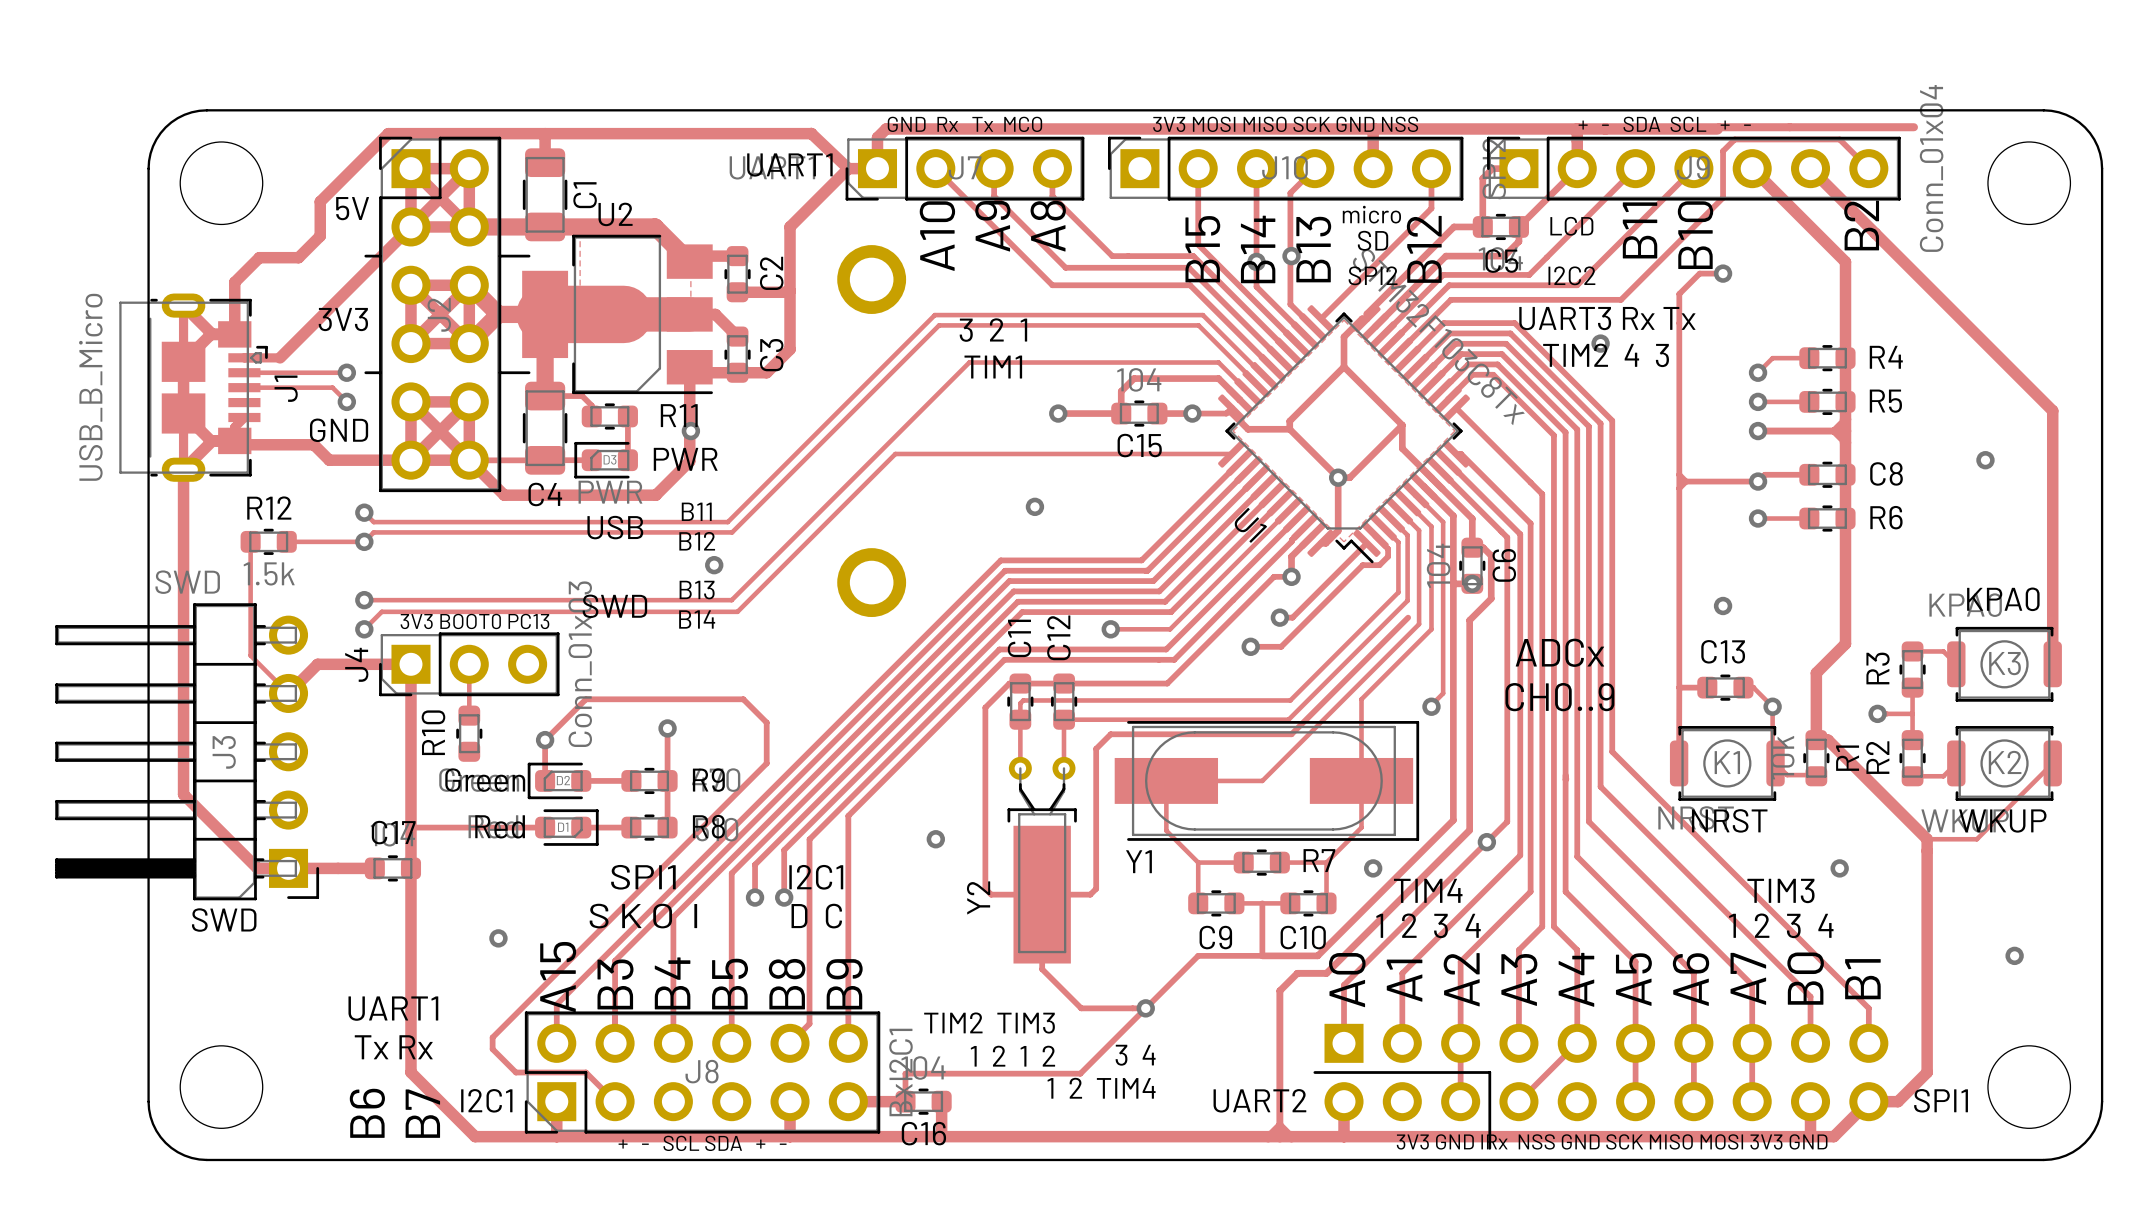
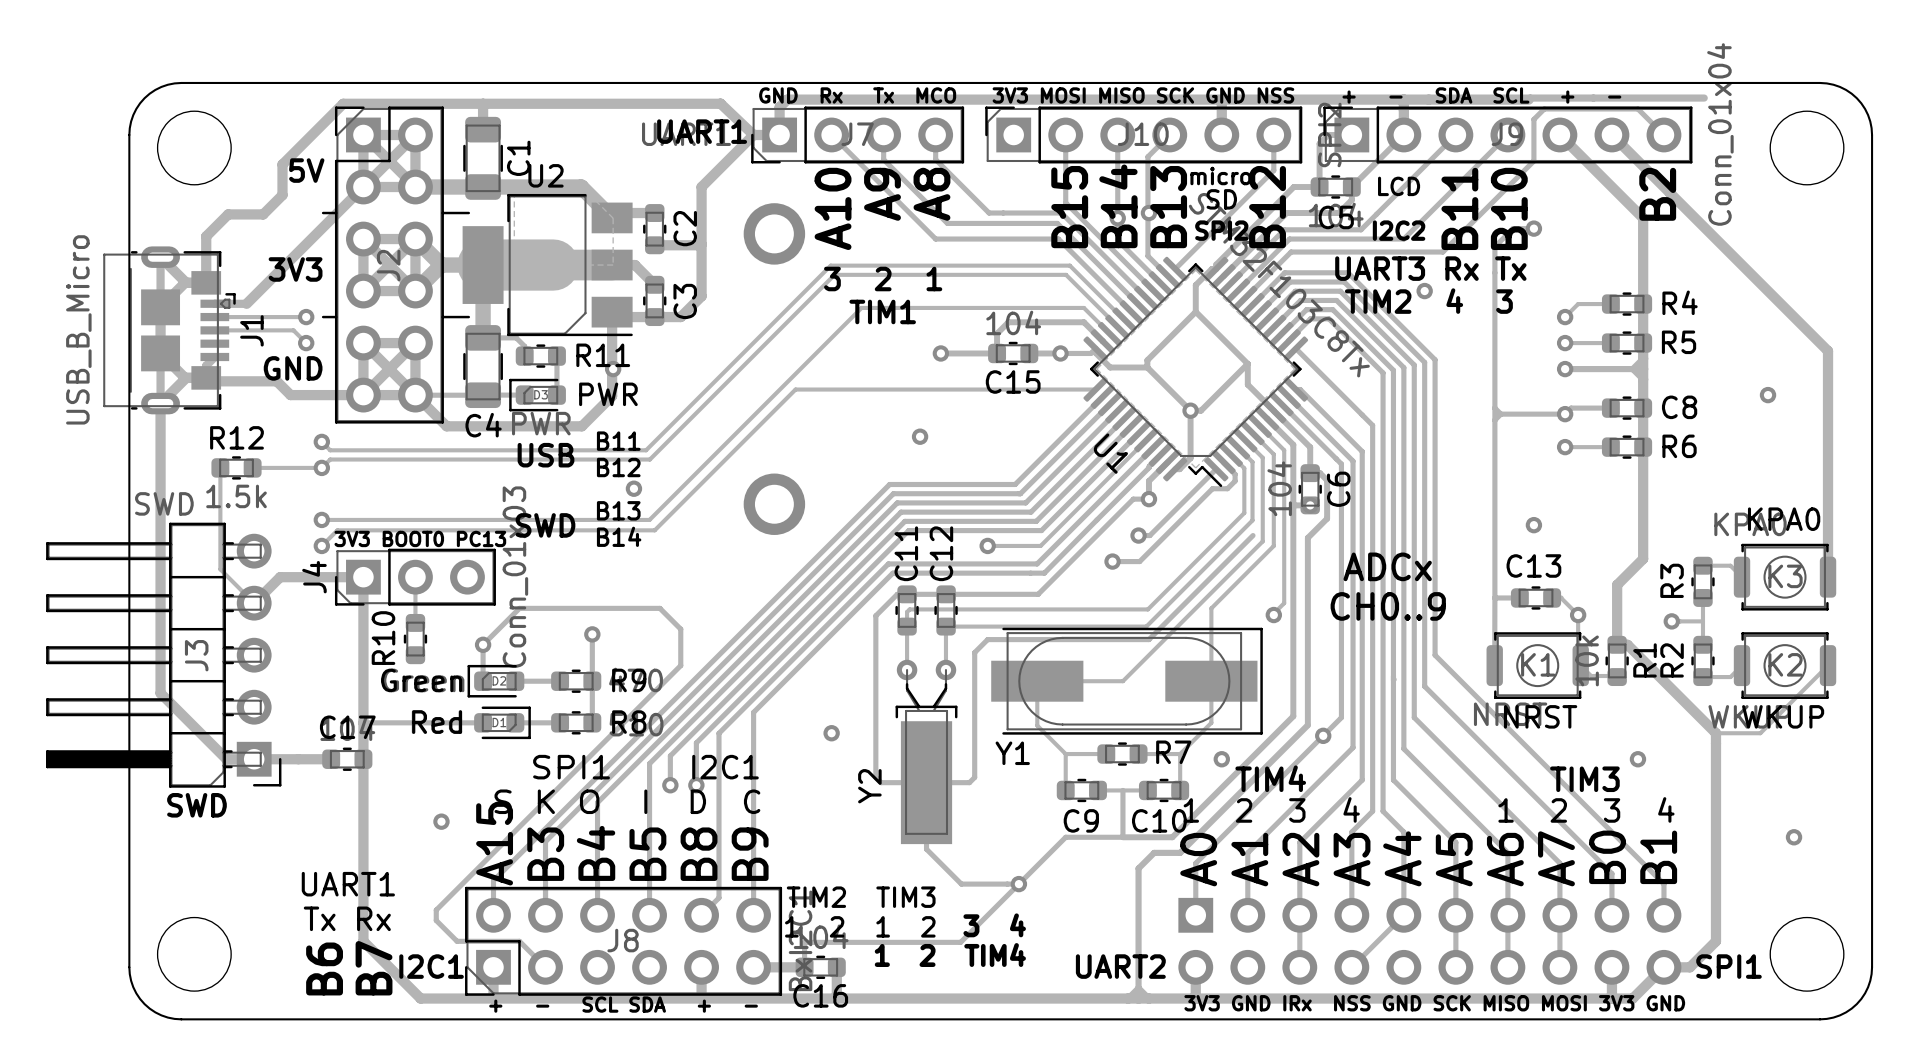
line: (1314, 1072) (1489, 1072) (1489, 1148) -> none

